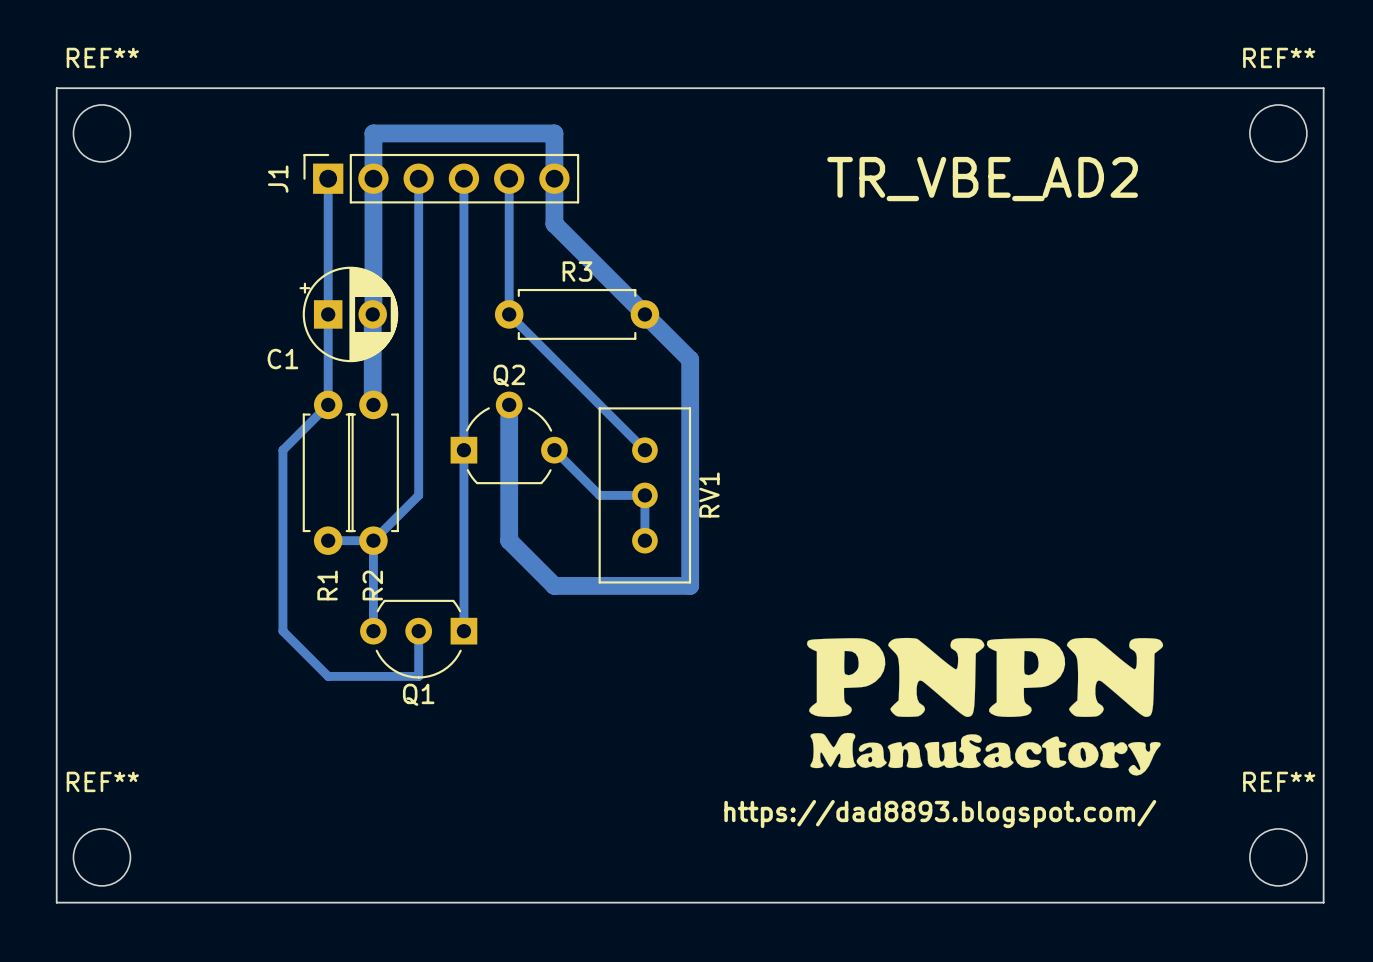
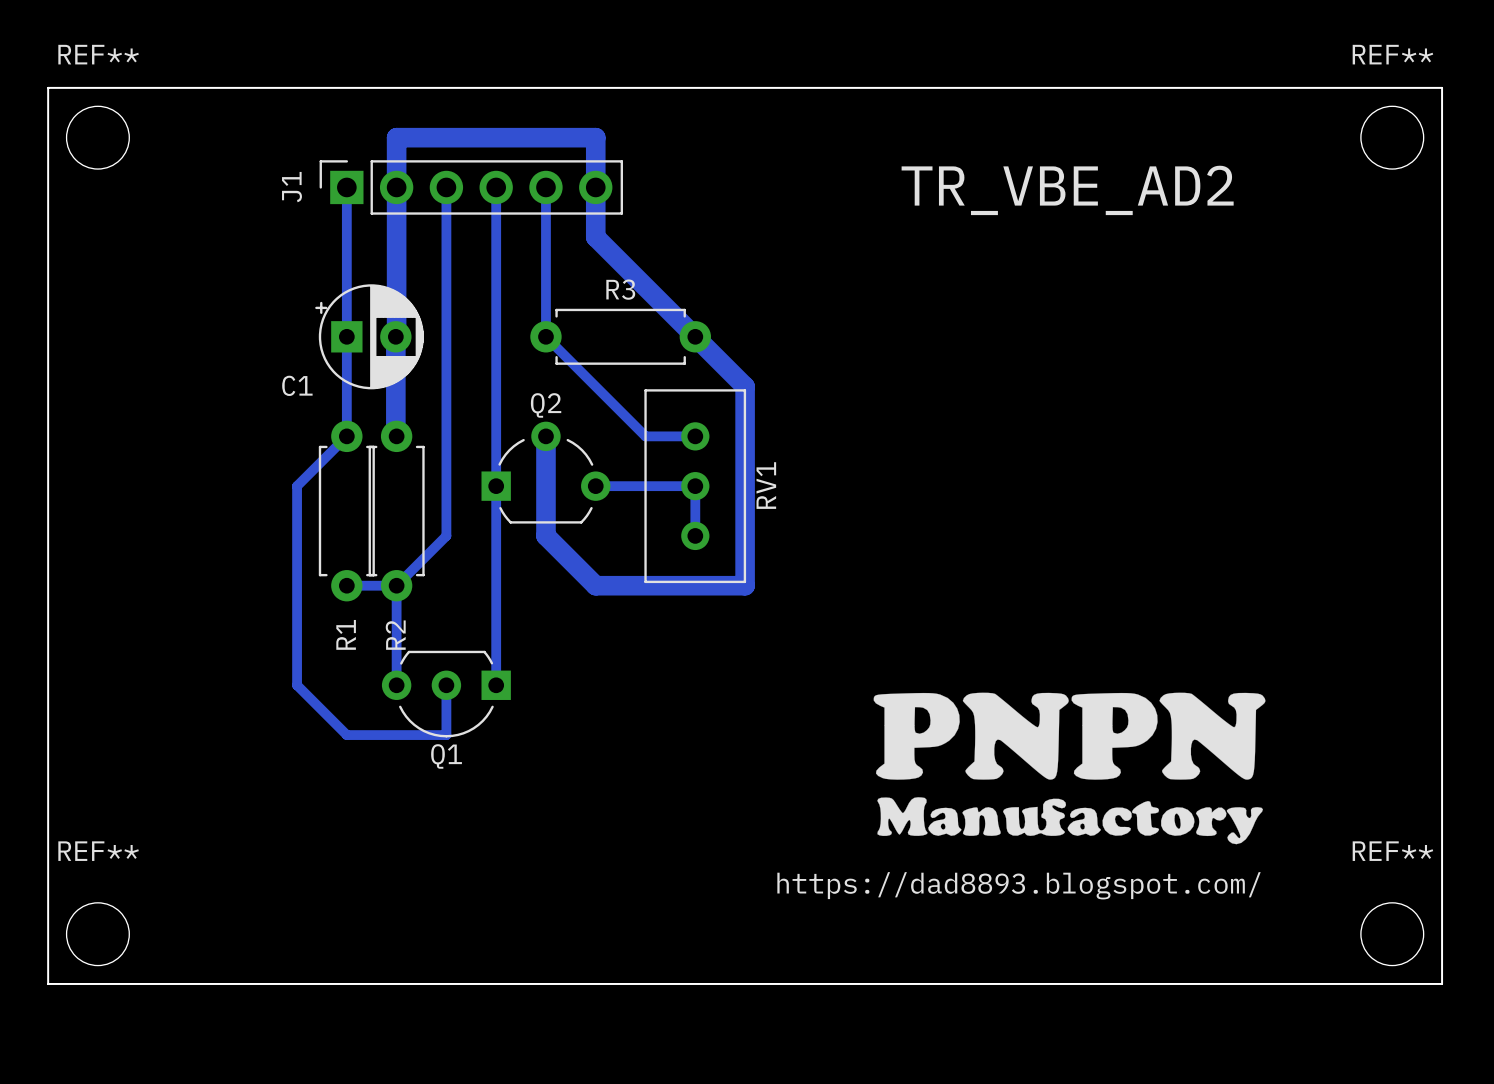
bottom track: (599, 404) (636, 441) -> (645, 436) (695, 436)
bottom track: (554, 450) (599, 495) (644, 495) (644, 540) -> (595, 486) (695, 486) (695, 535)
bottom track: (509, 495) (509, 540) (554, 585) (690, 585) (690, 540) -> (545, 535) (595, 585) (745, 585)
RV1 position: (644, 495) -> (695, 486)

